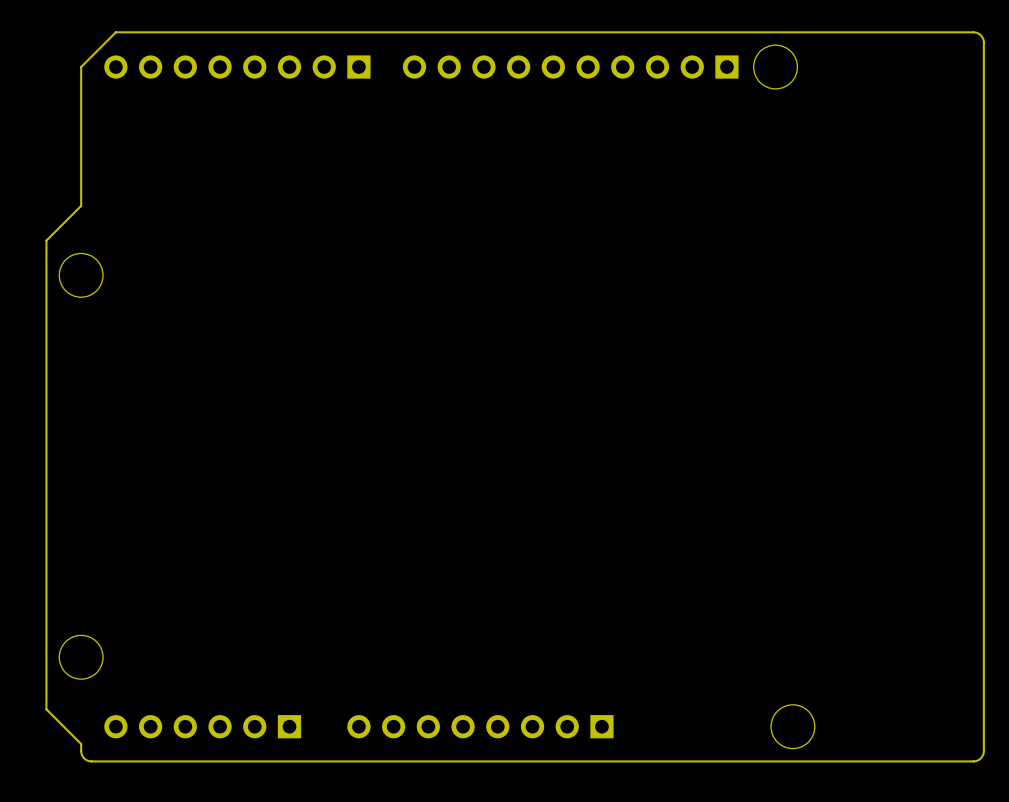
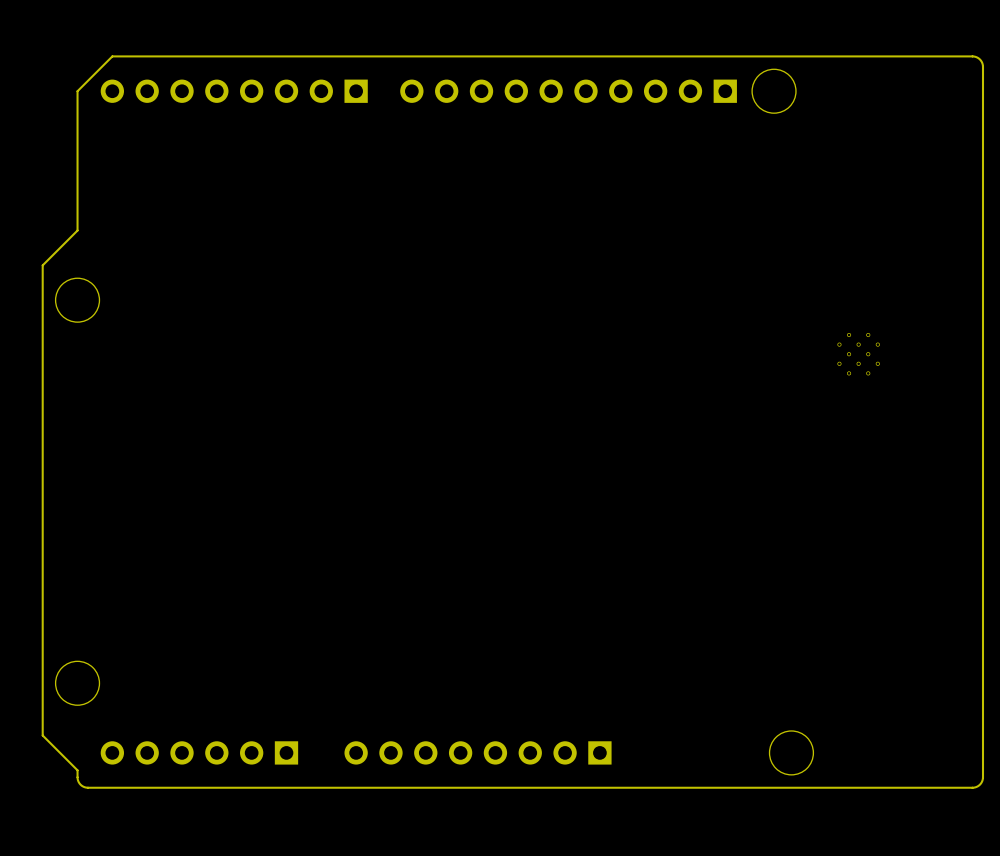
part: none -> (858, 354)

